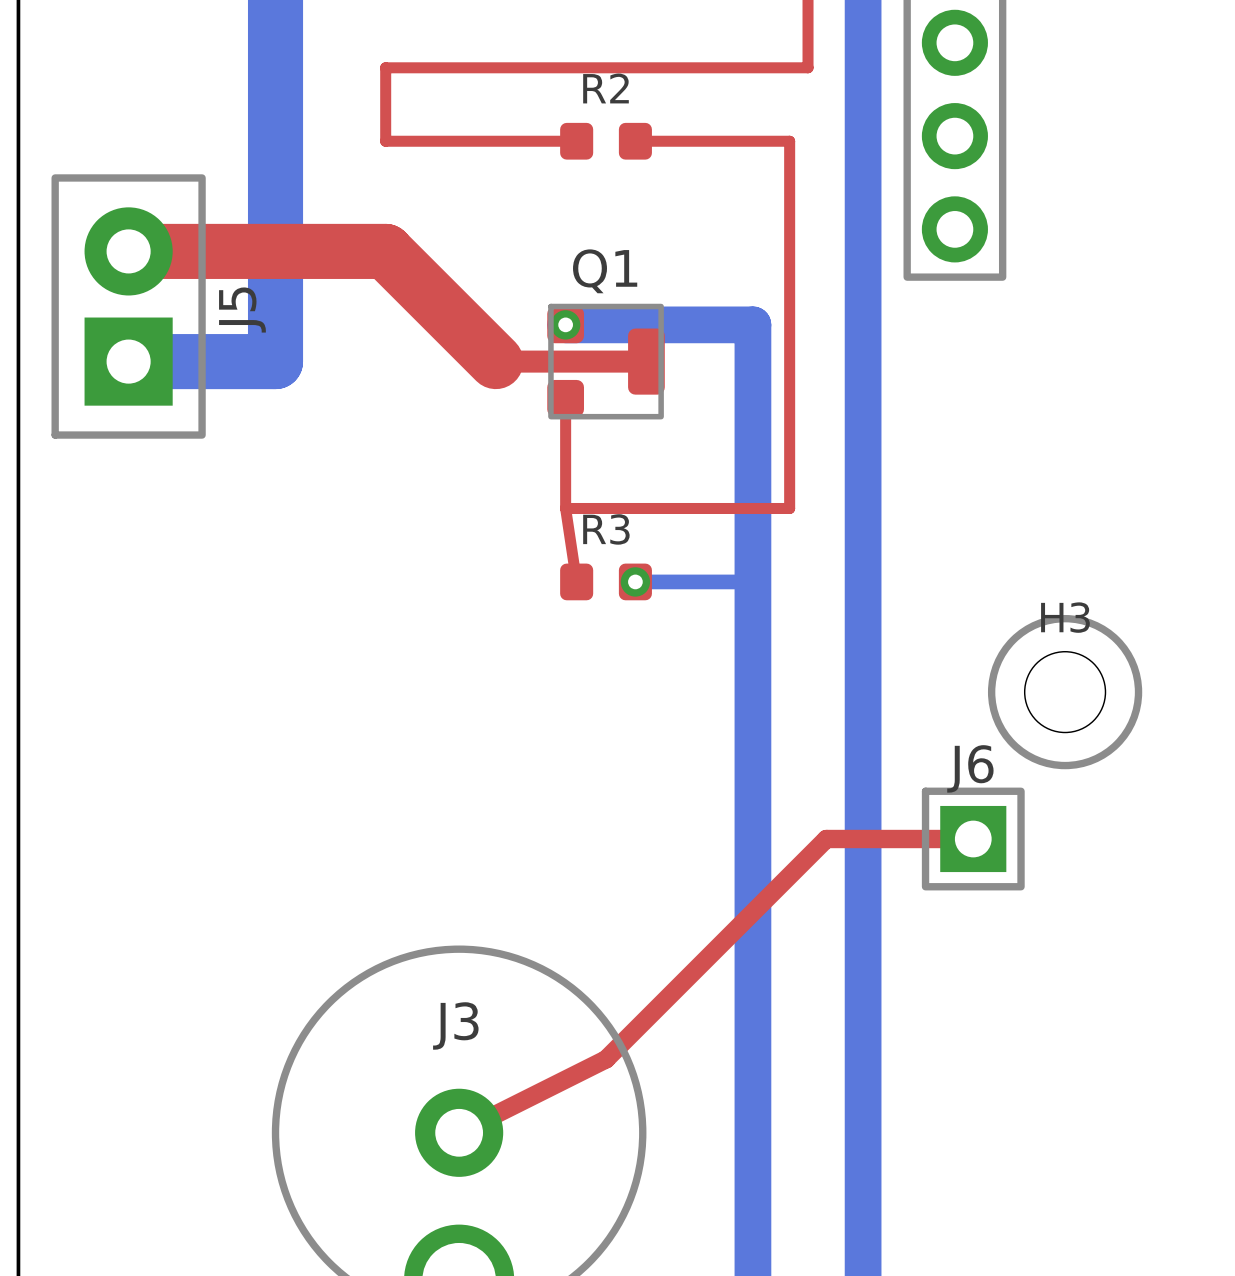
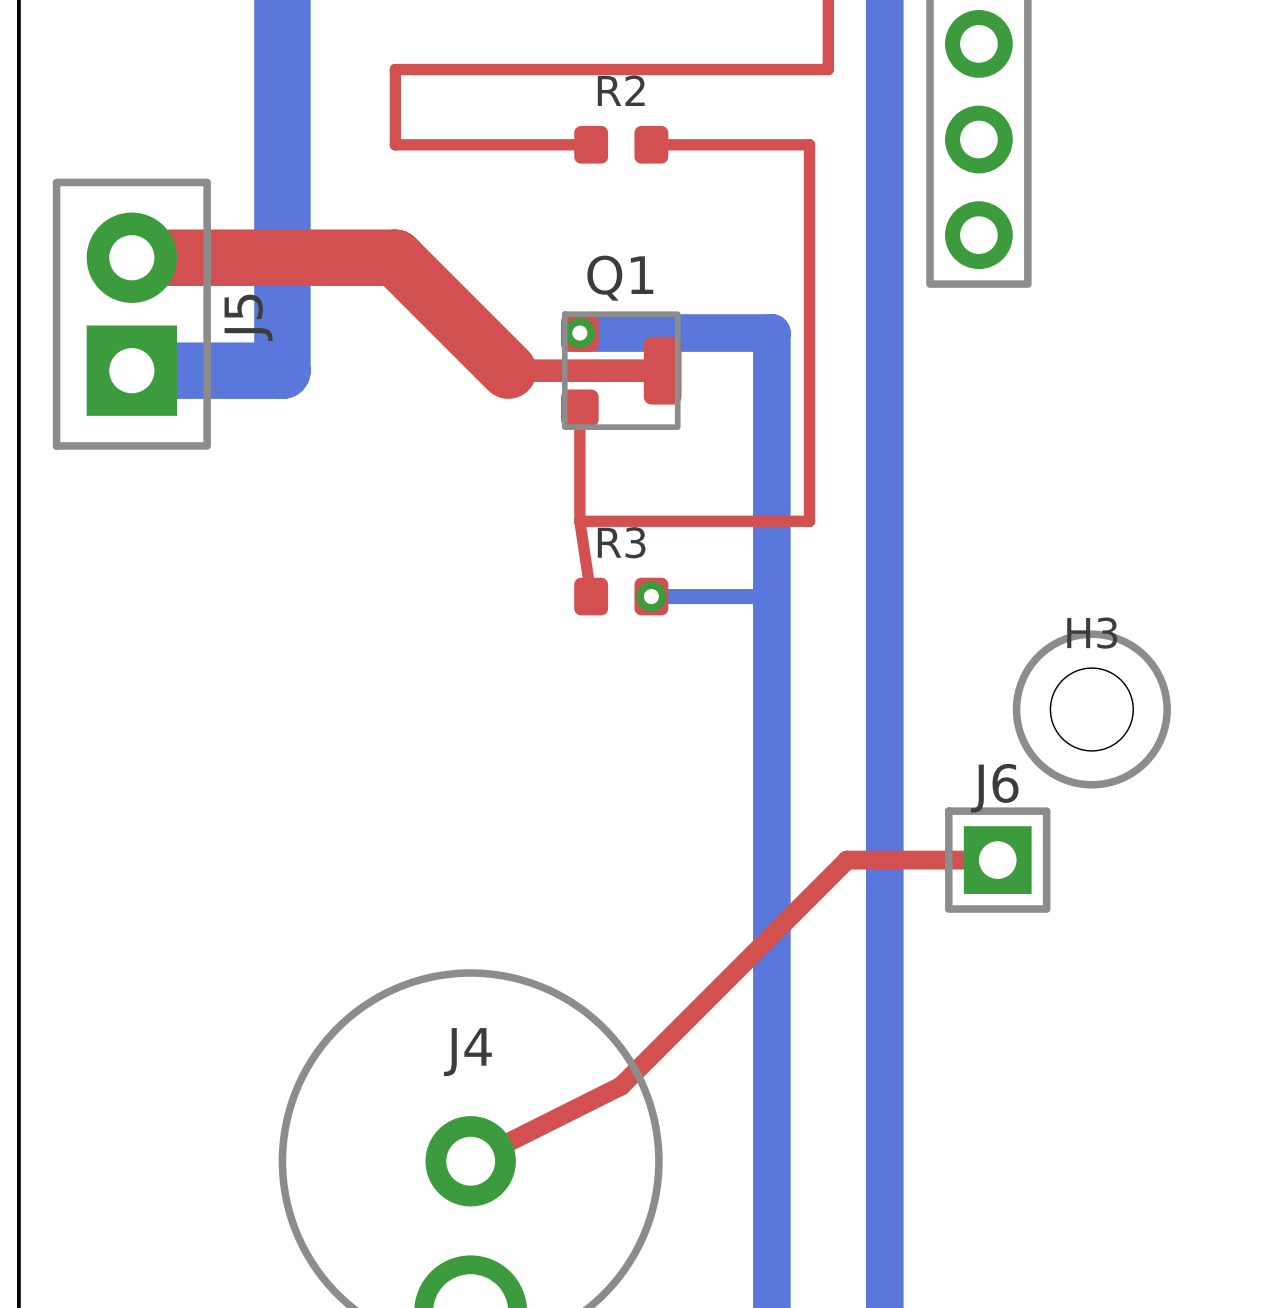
J3 name: J3 (455, 1025) -> J4 (467, 1052)

